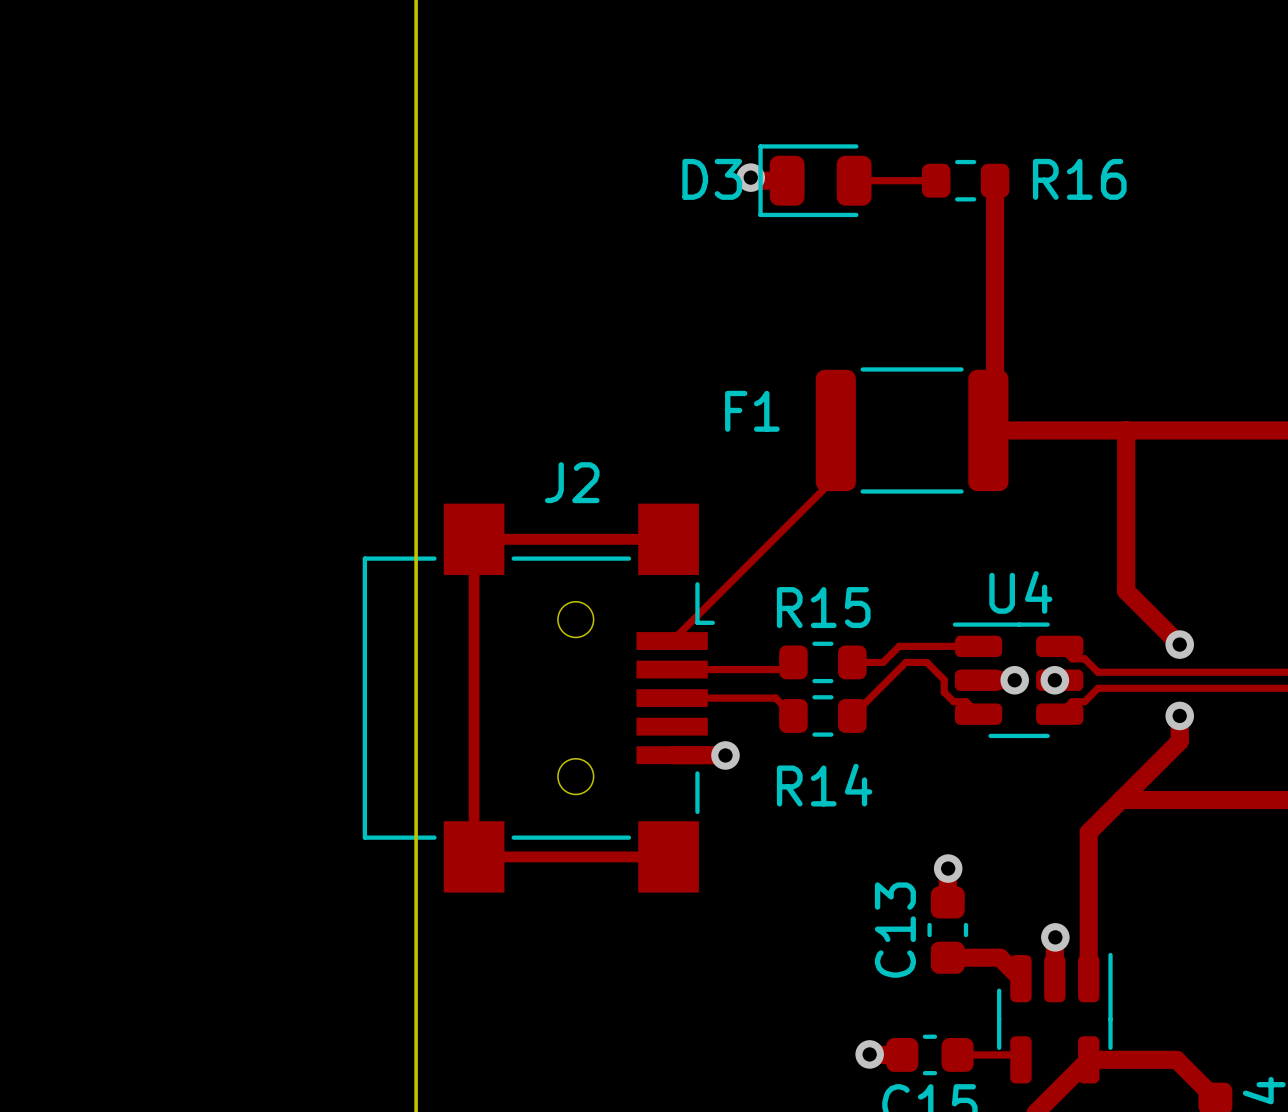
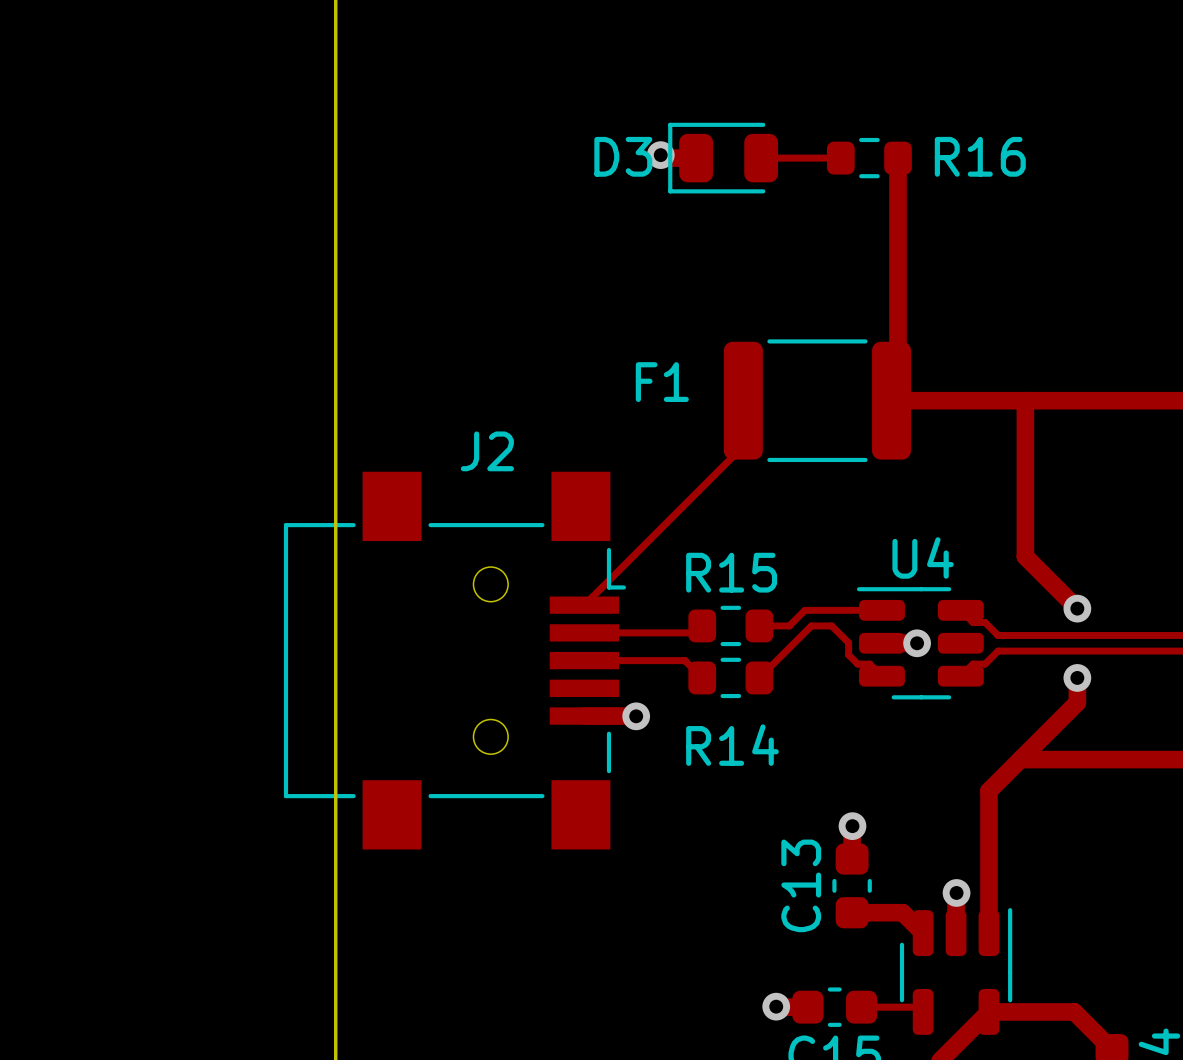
track: (668, 539) (474, 539) (474, 856) (668, 856) -> none
via: (1054, 680) -> none

